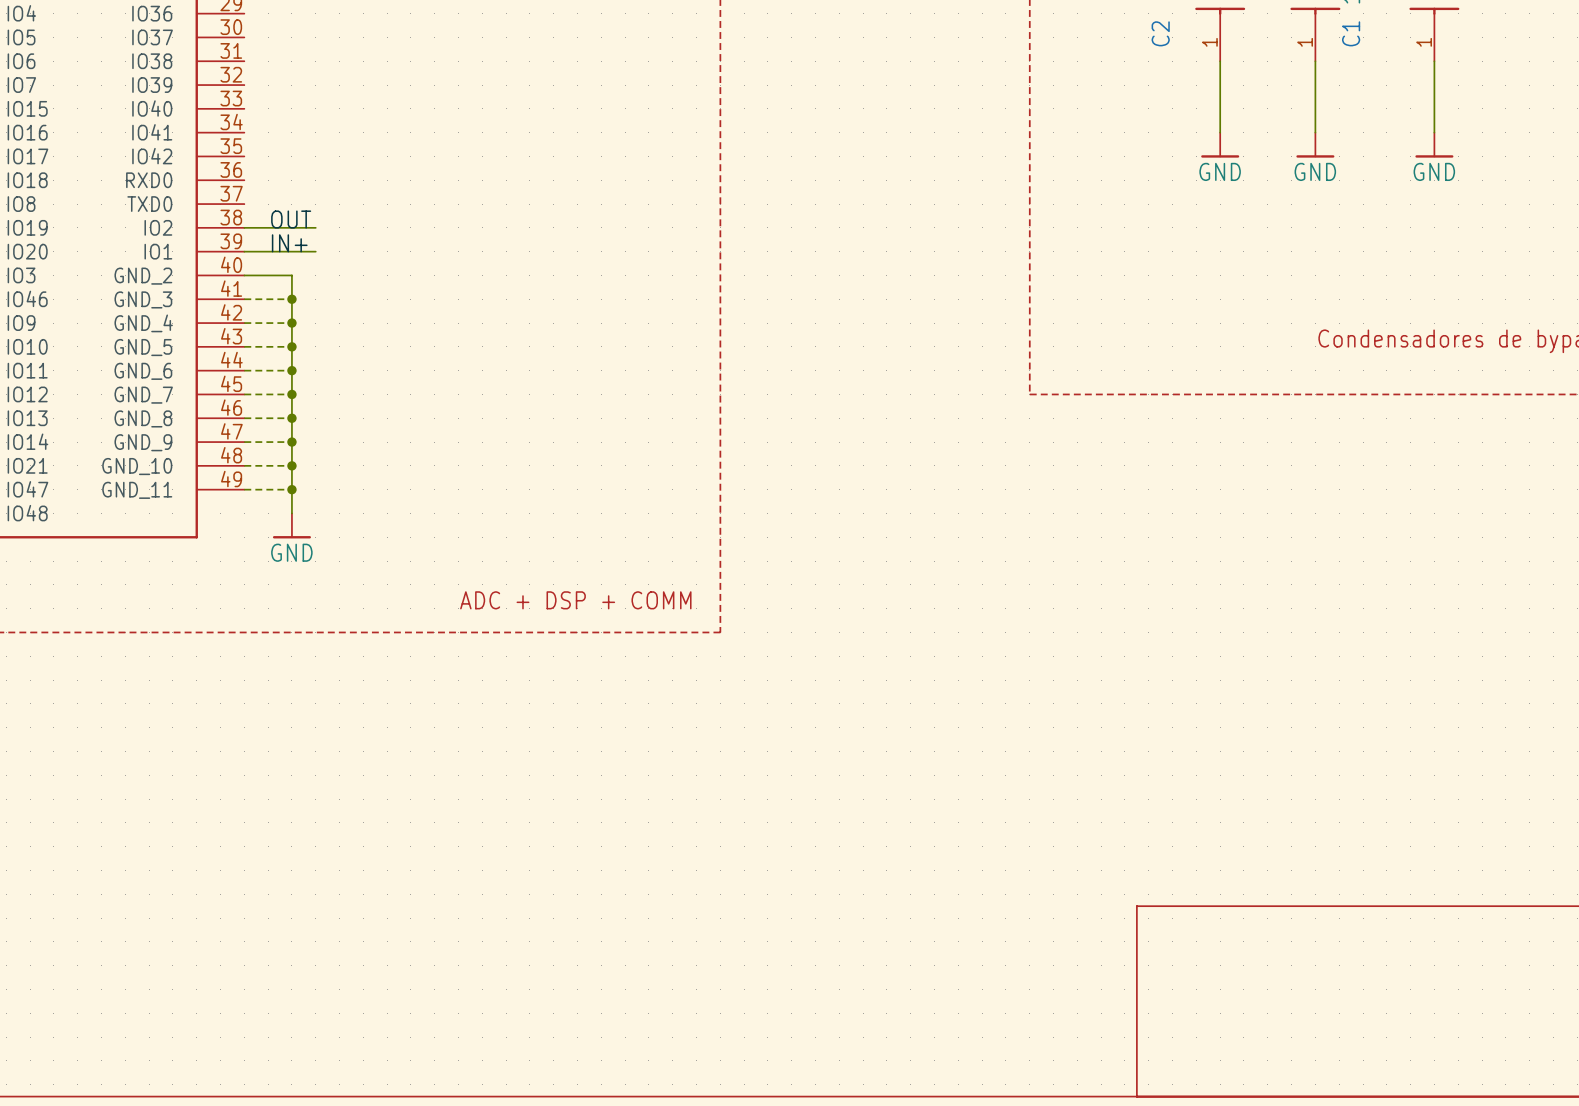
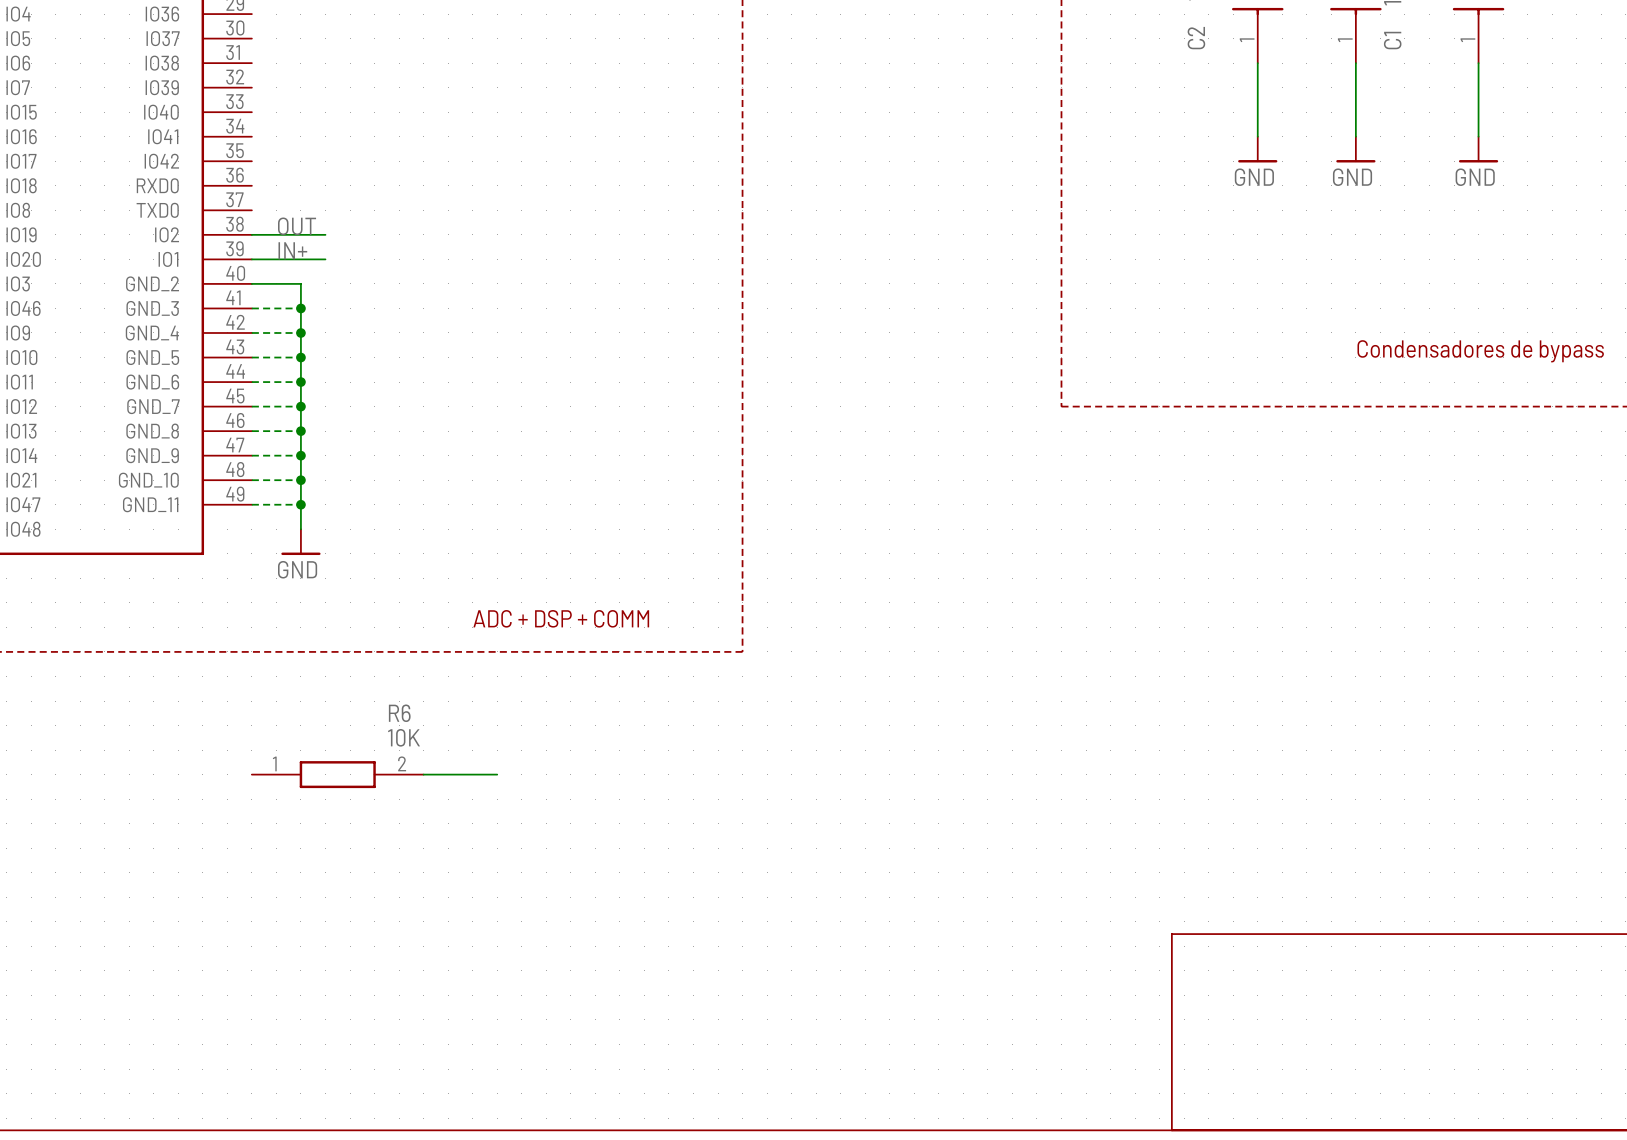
R6: none -> 10K (337, 774)
wire: none -> (423, 774) (497, 774)

